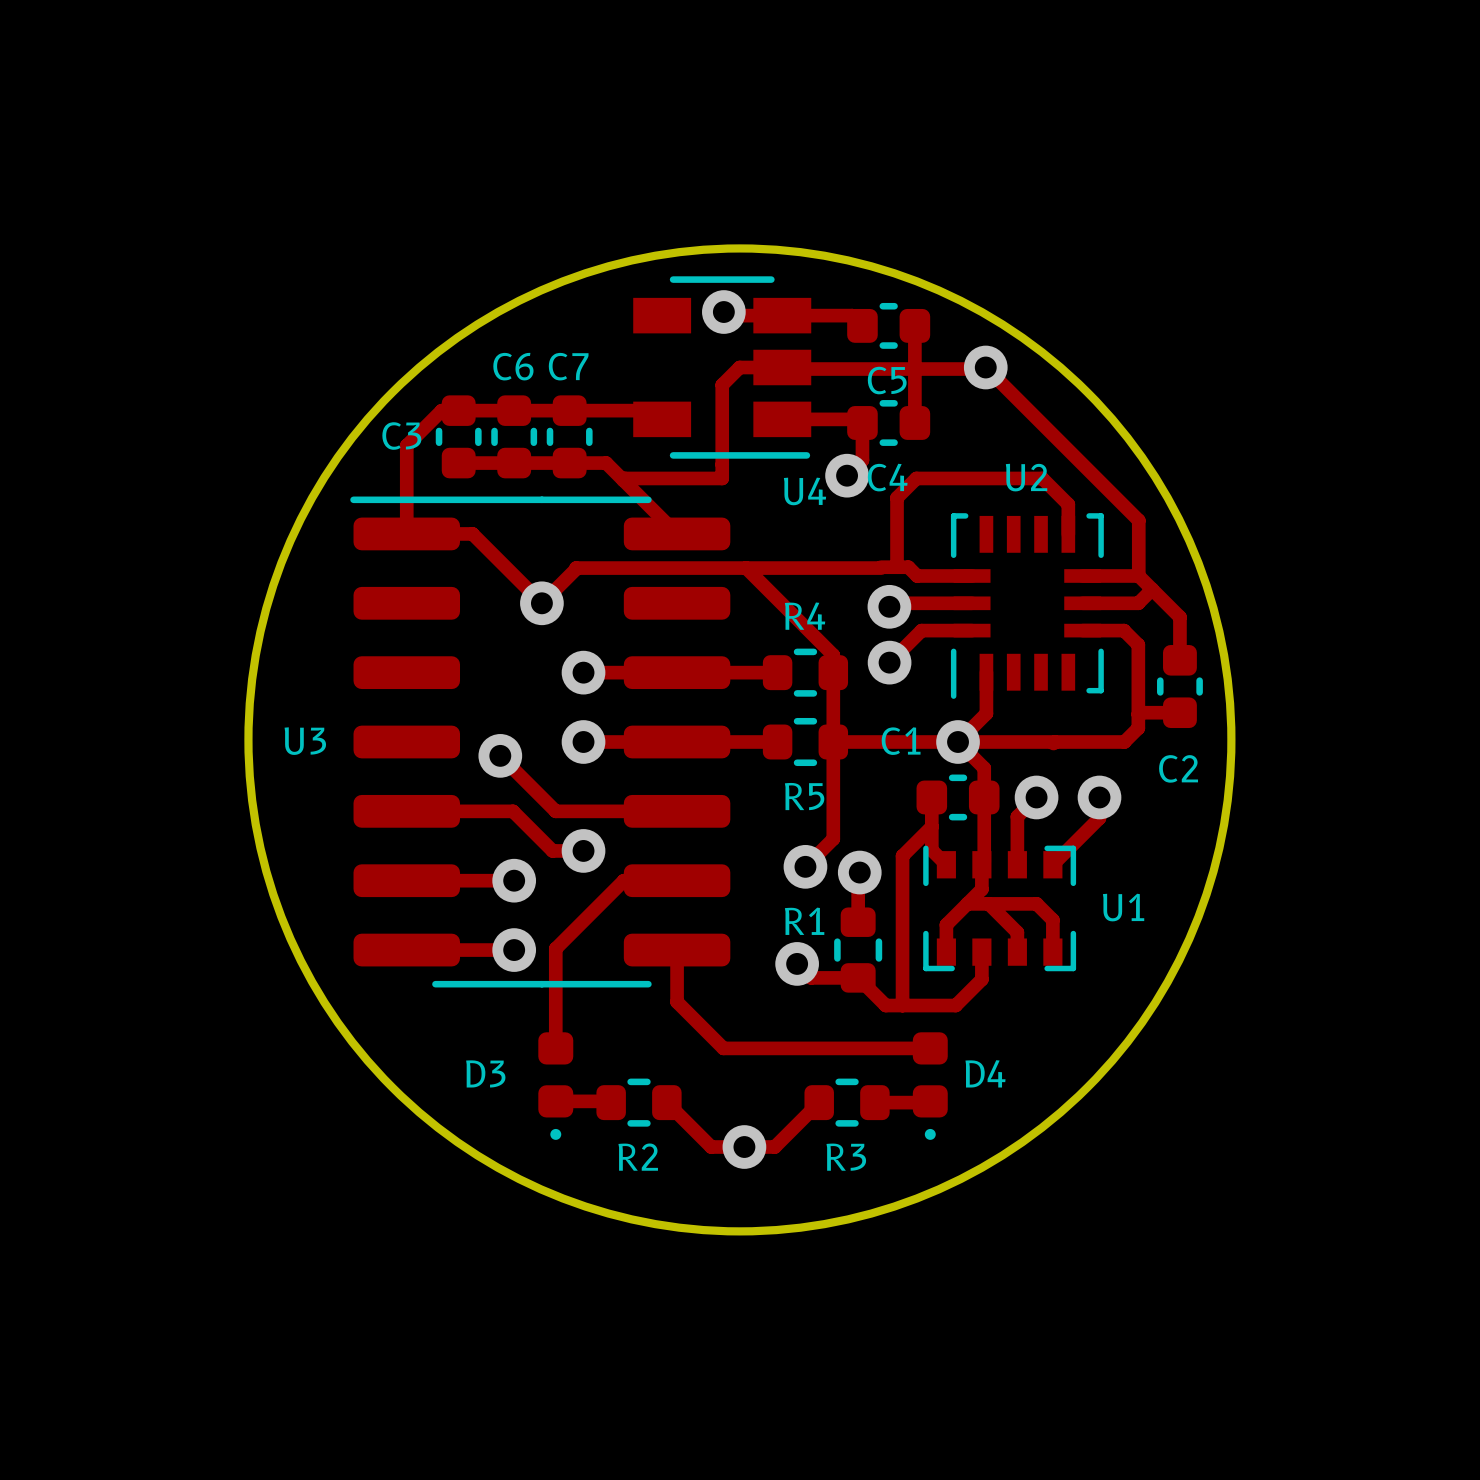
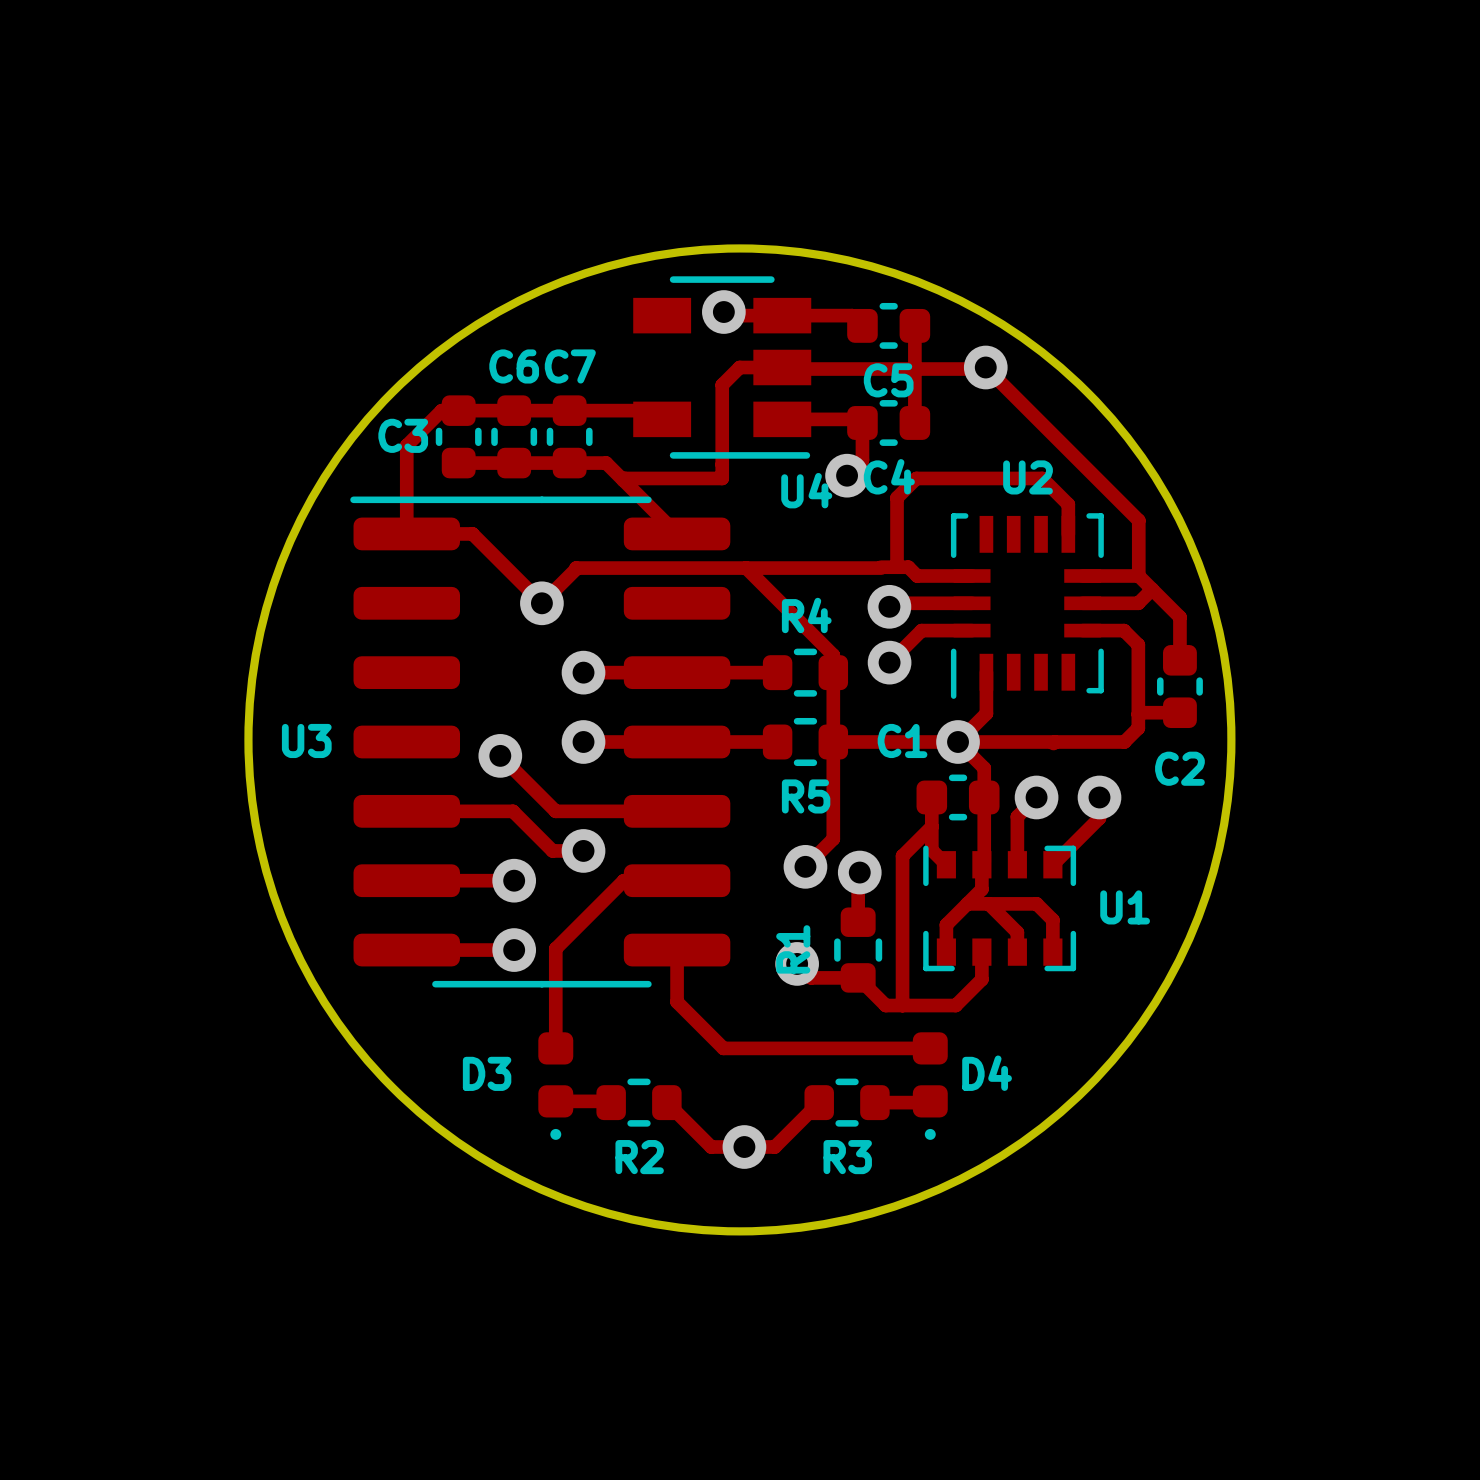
R1 name rotation: 0° (804, 921) -> 90° counterclockwise (793, 949)

